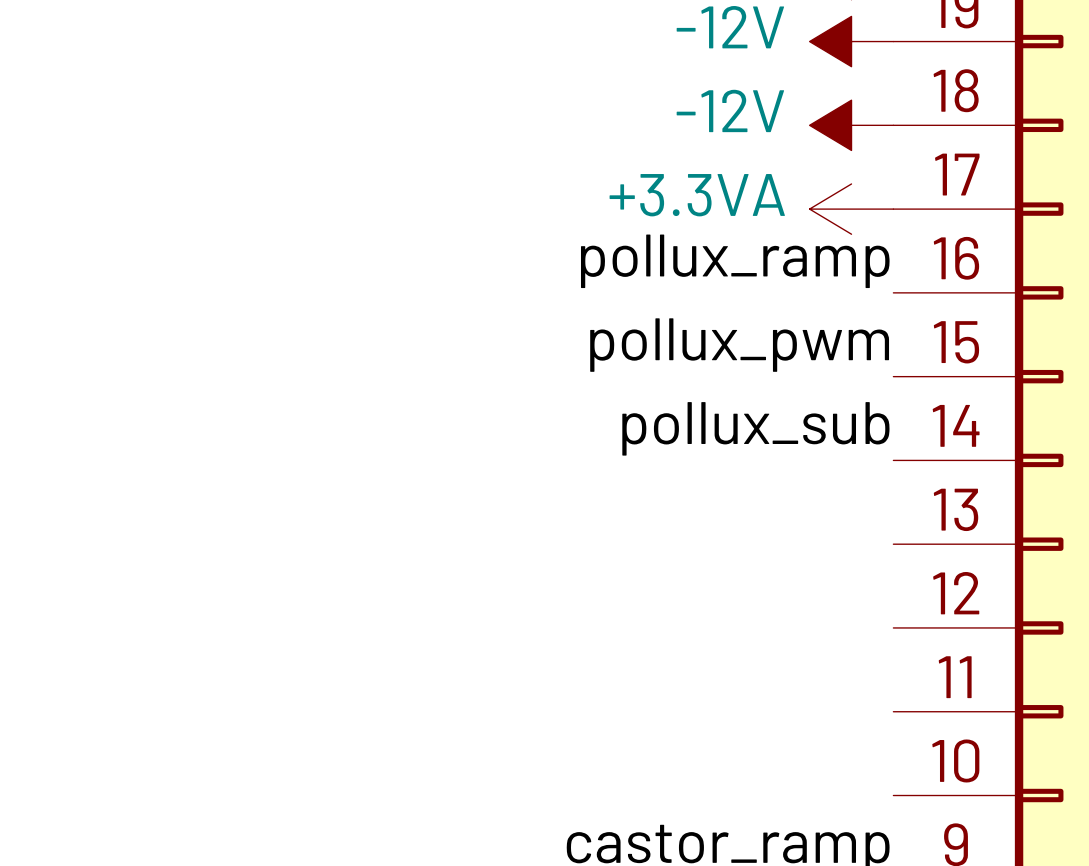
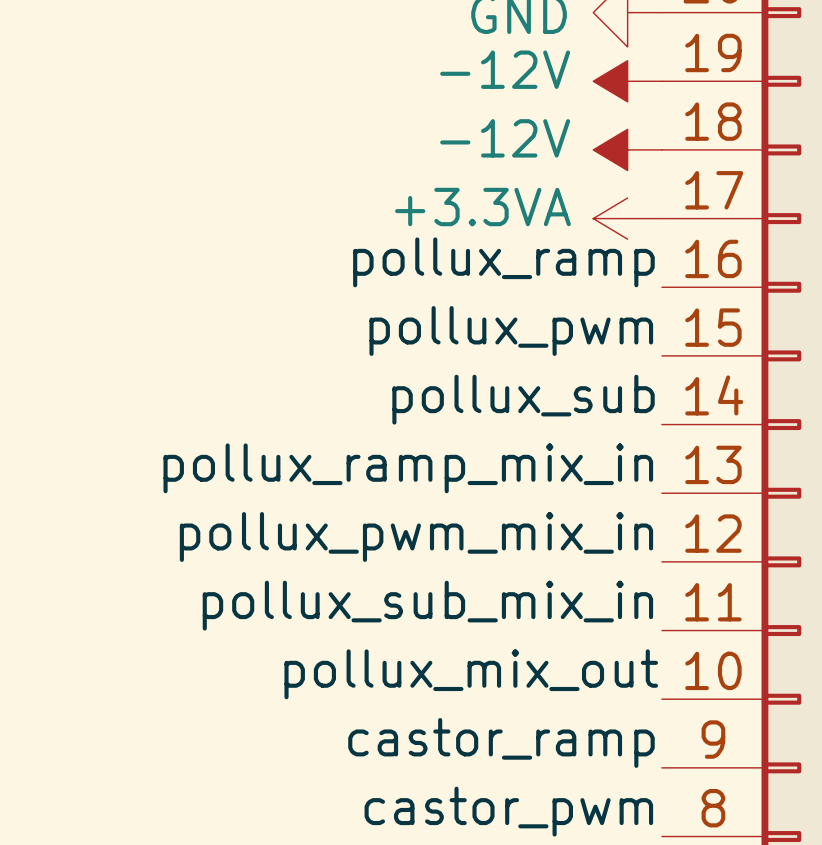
label: none -> pollux_ramp_mix_in (408, 468)
label: none -> pollux_pwm_mix_in (416, 536)
label: none -> pollux_sub_mix_in (427, 605)
label: none -> pollux_mix_out (471, 674)

